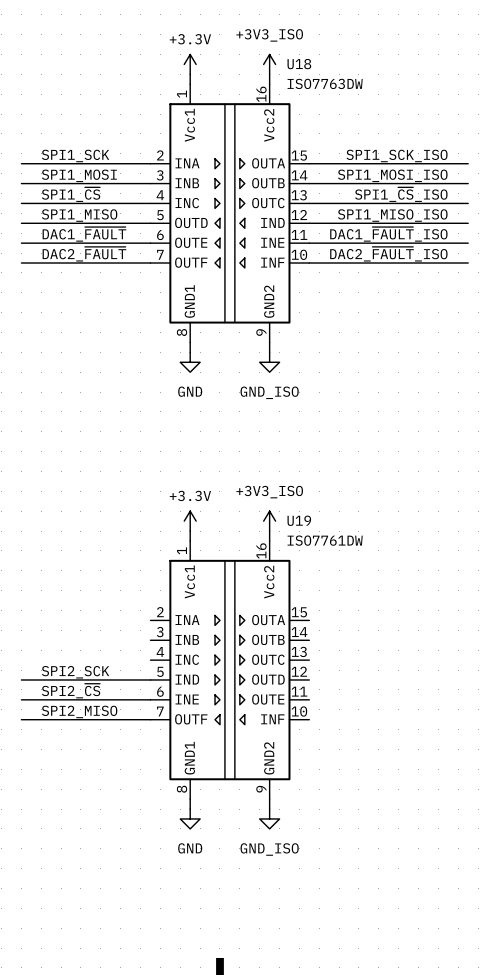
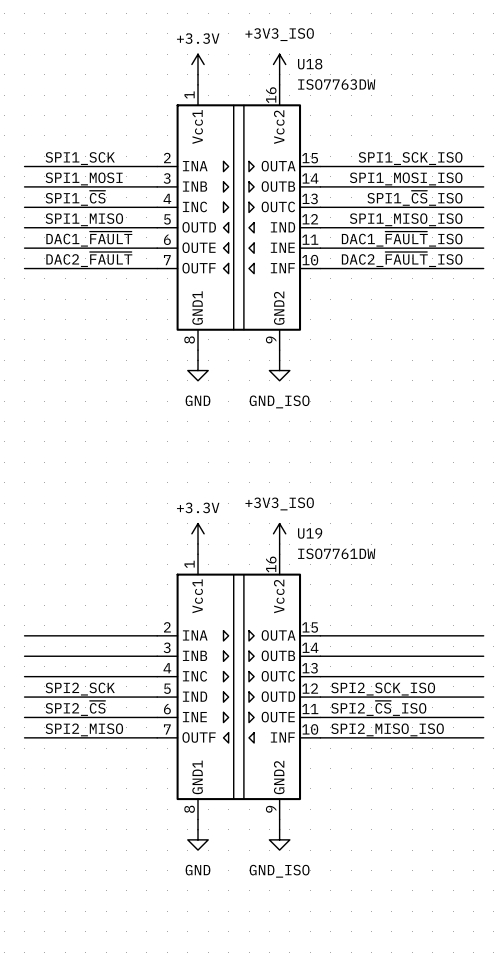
wire: none -> (24, 635) (157, 635)
wire: none -> (320, 635) (483, 635)
wire: none -> (24, 656) (157, 656)
wire: none -> (320, 656) (483, 656)
wire: none -> (24, 676) (157, 676)
wire: none -> (320, 676) (483, 676)
label: none -> SPI2_SCK_ISO (383, 689)
wire: none -> (320, 697) (483, 697)
label: none -> SPI2_~{CS}_ISO (378, 708)
wire: none -> (320, 717) (483, 717)
label: none -> SPI2_MISO_ISO (387, 729)
wire: none -> (320, 737) (483, 737)

